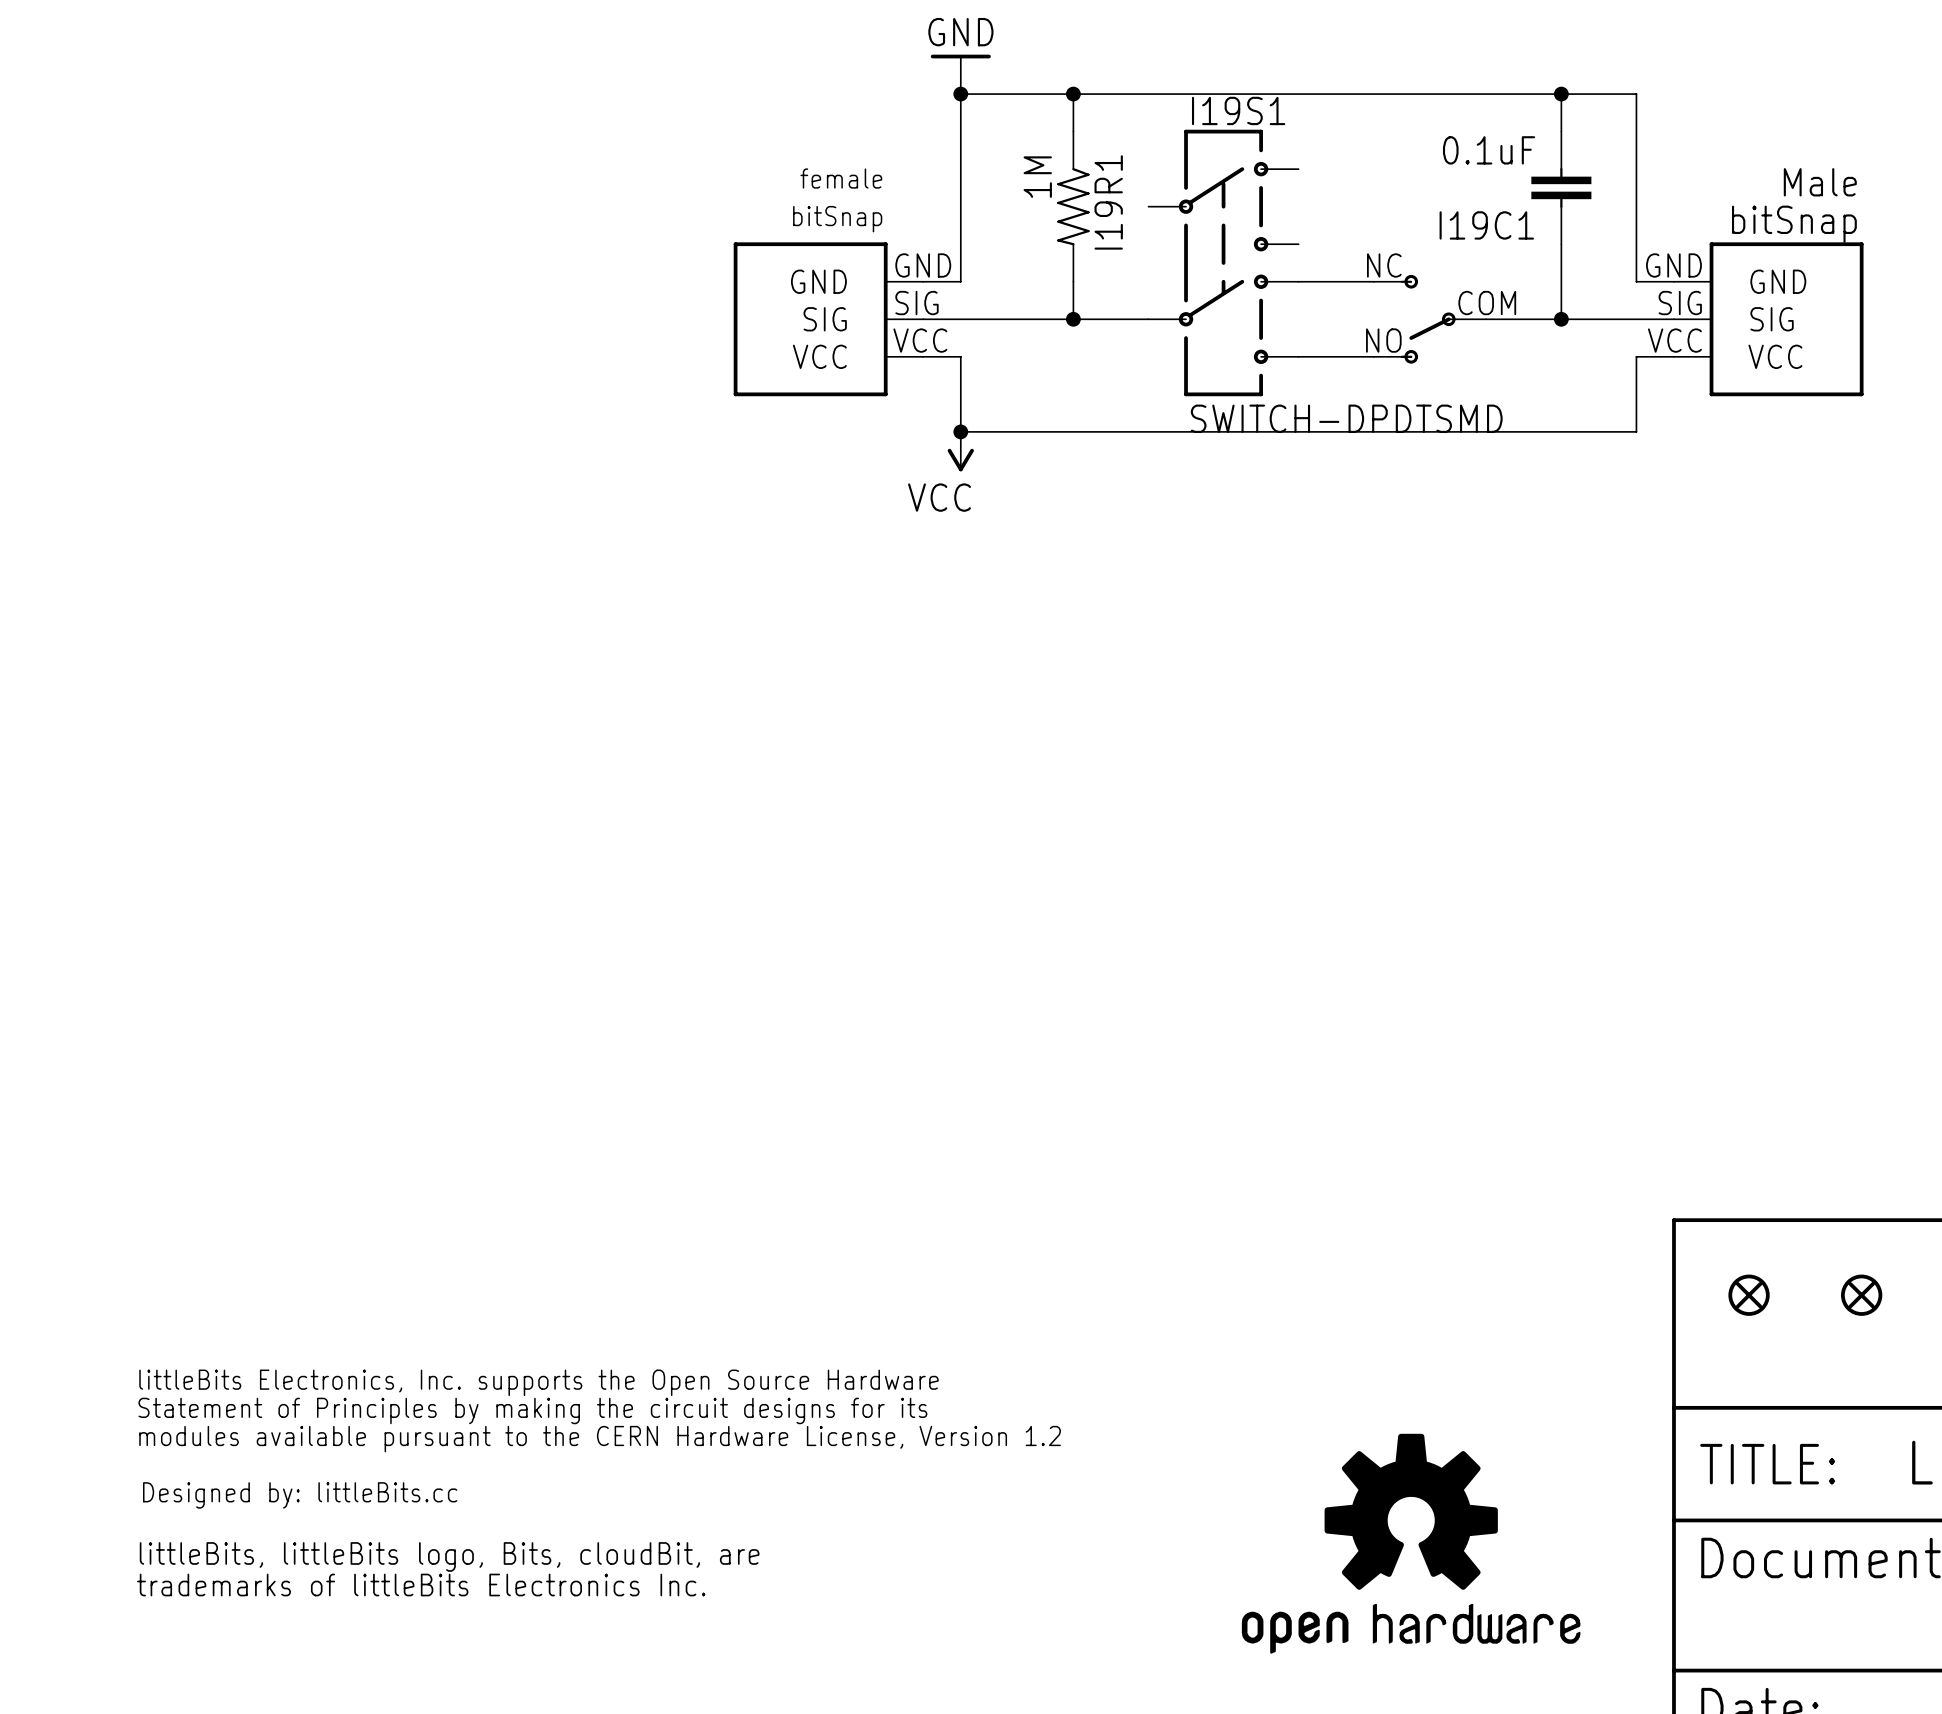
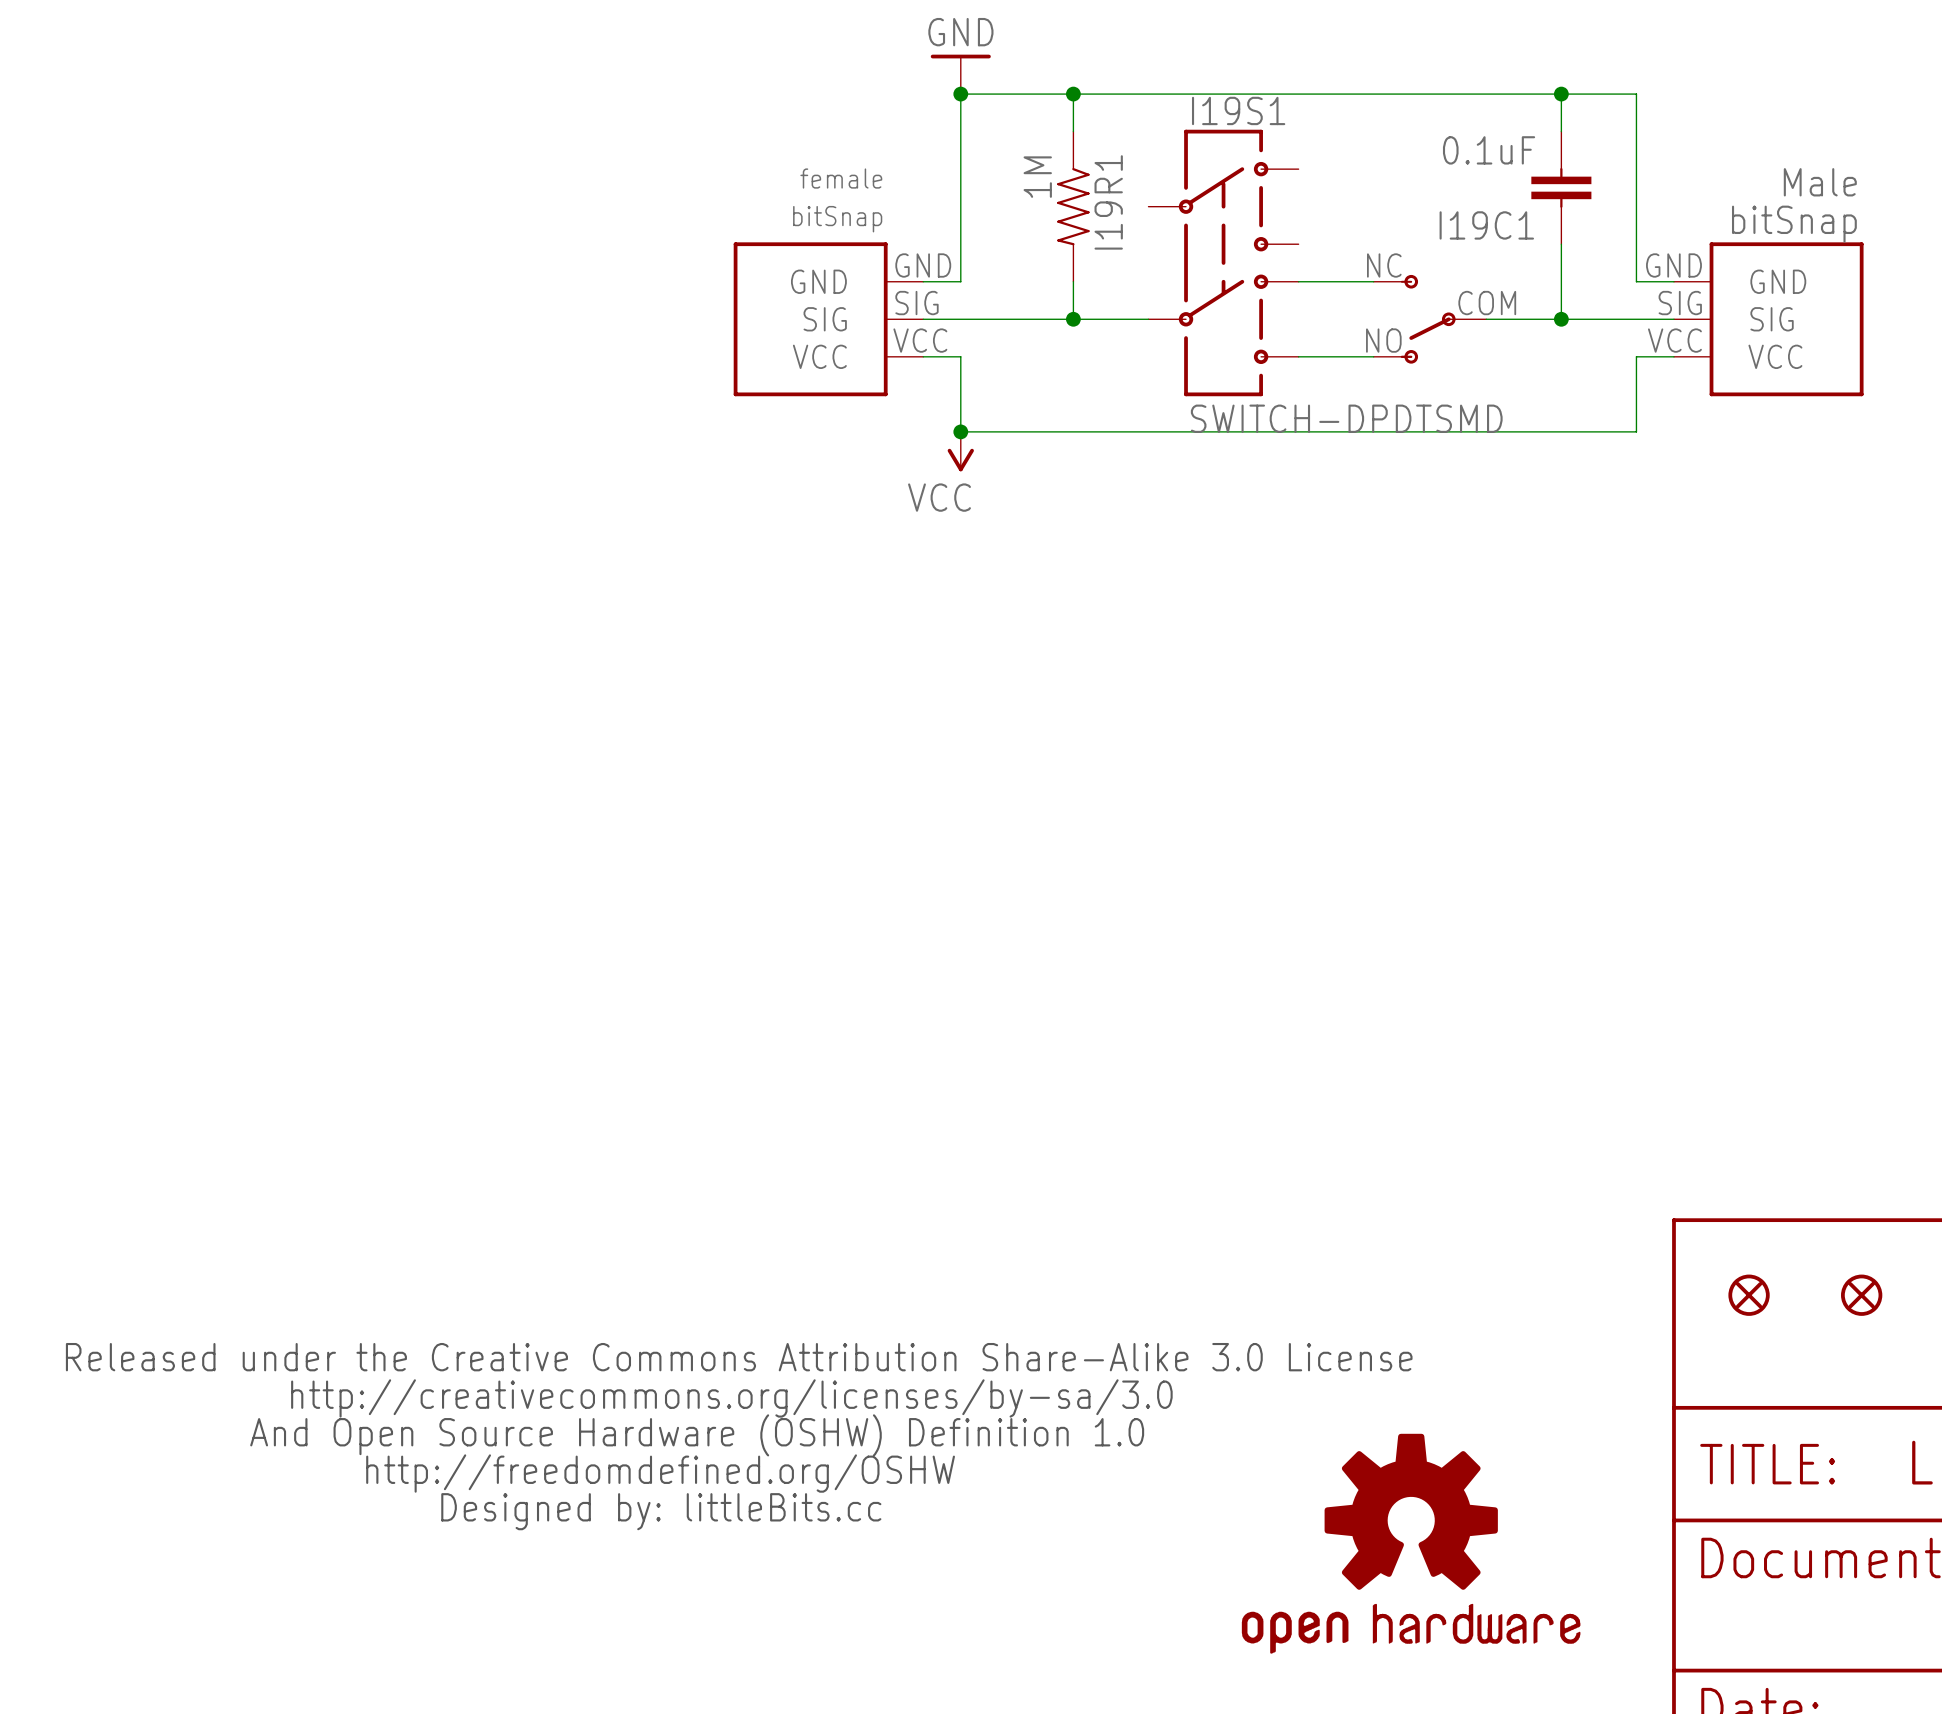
part: none -> (739, 1436)
part: (599, 1482) -> none

